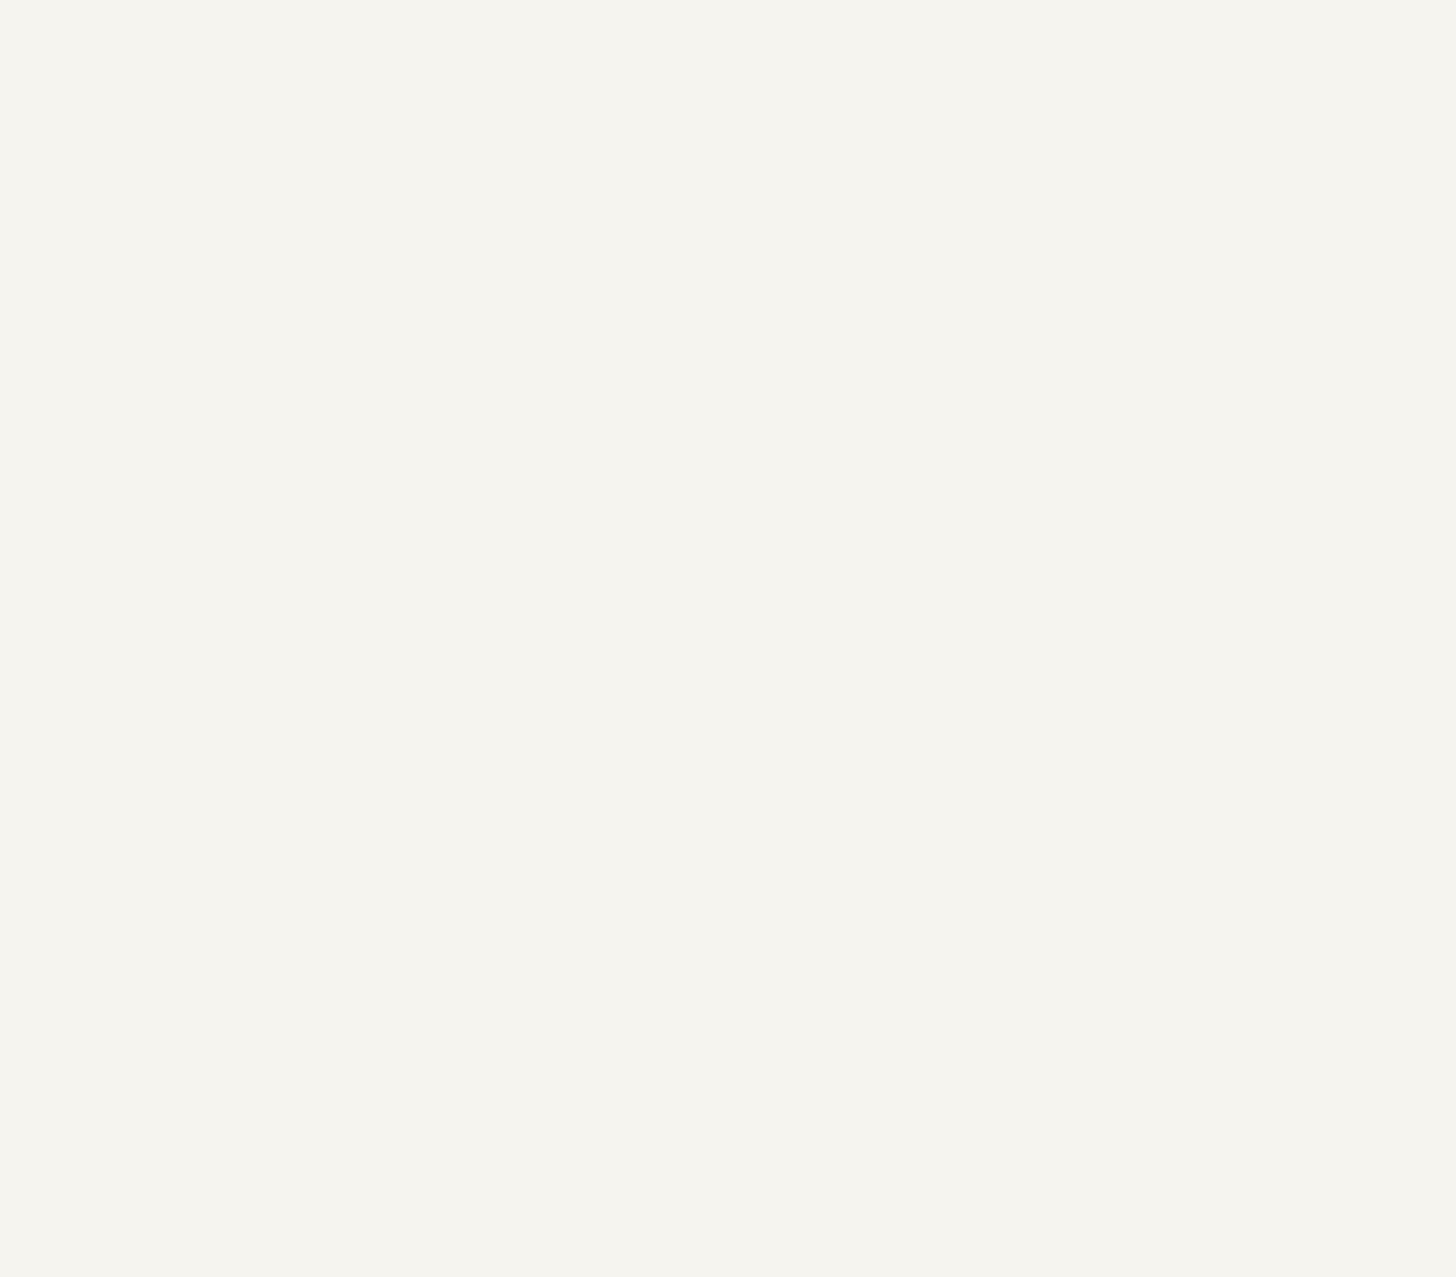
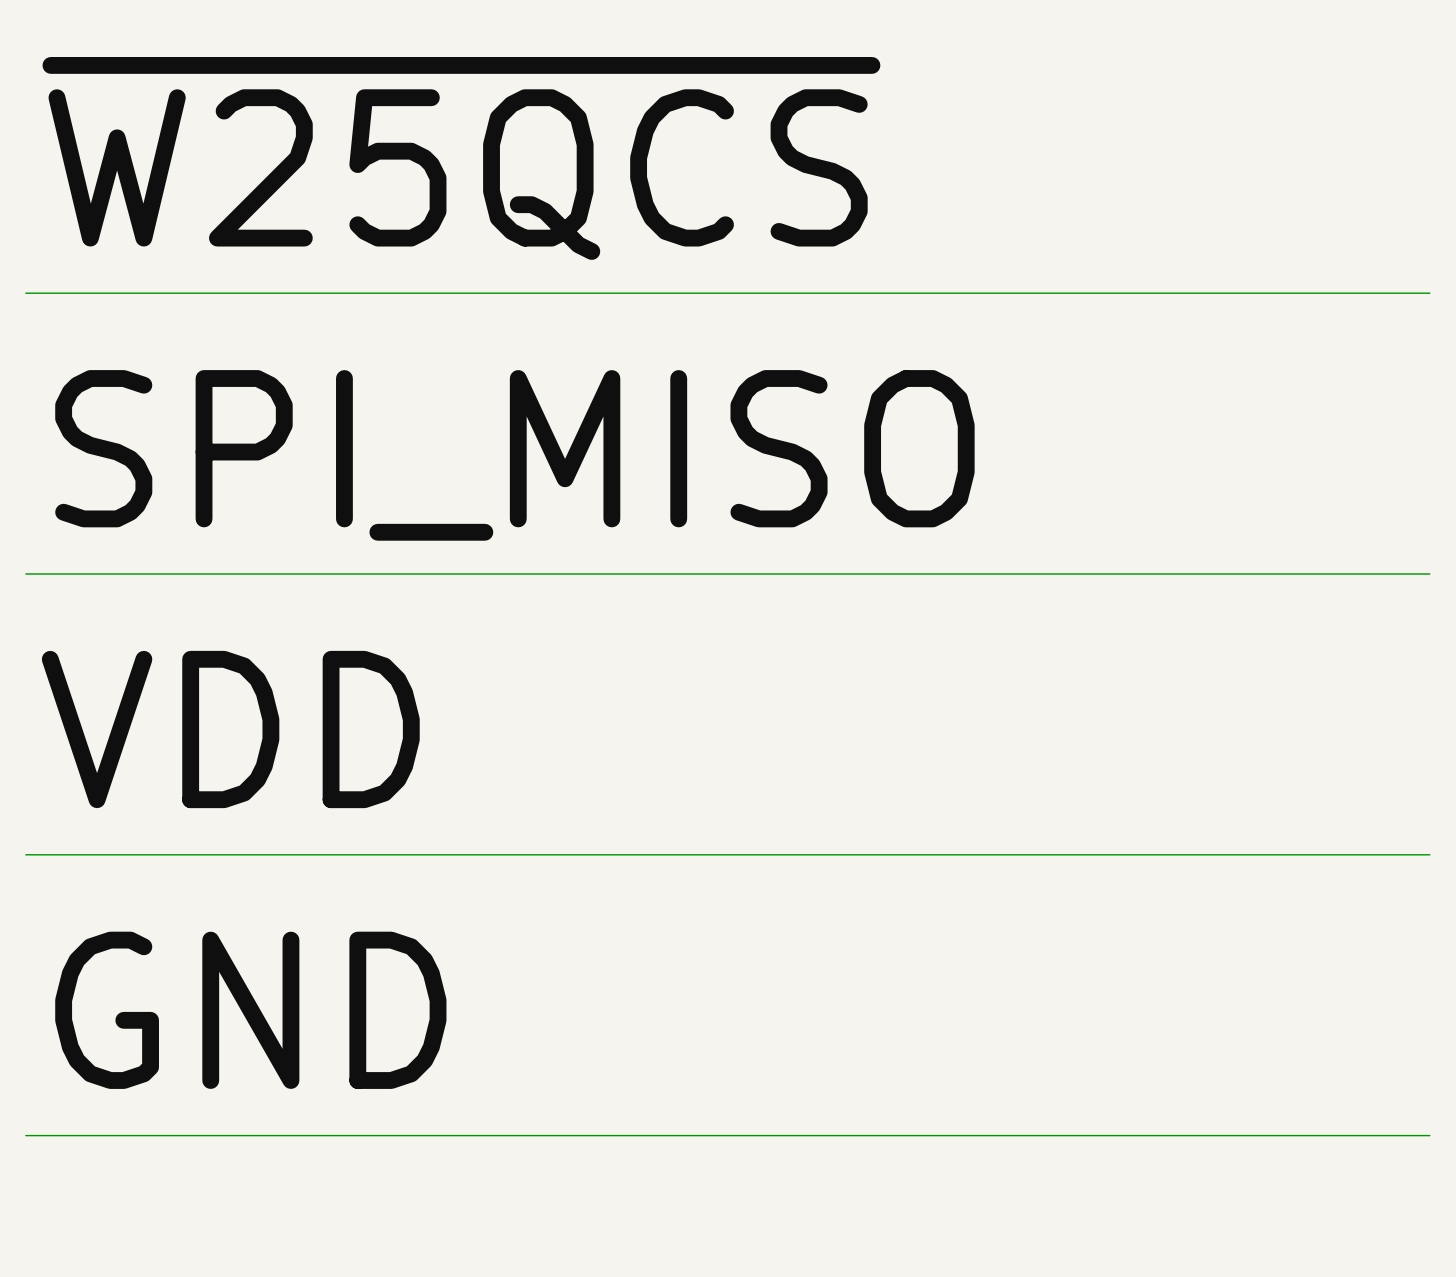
label: none -> ~{W25QCS} (461, 158)
wire: none -> (25, 293) (1429, 293)
label: none -> SPI_MISO (514, 455)
wire: none -> (25, 573) (1429, 573)
label: none -> VDD (230, 729)
wire: none -> (25, 854) (1429, 854)
label: none -> GND (250, 1010)
wire: none -> (25, 1135) (1429, 1135)

